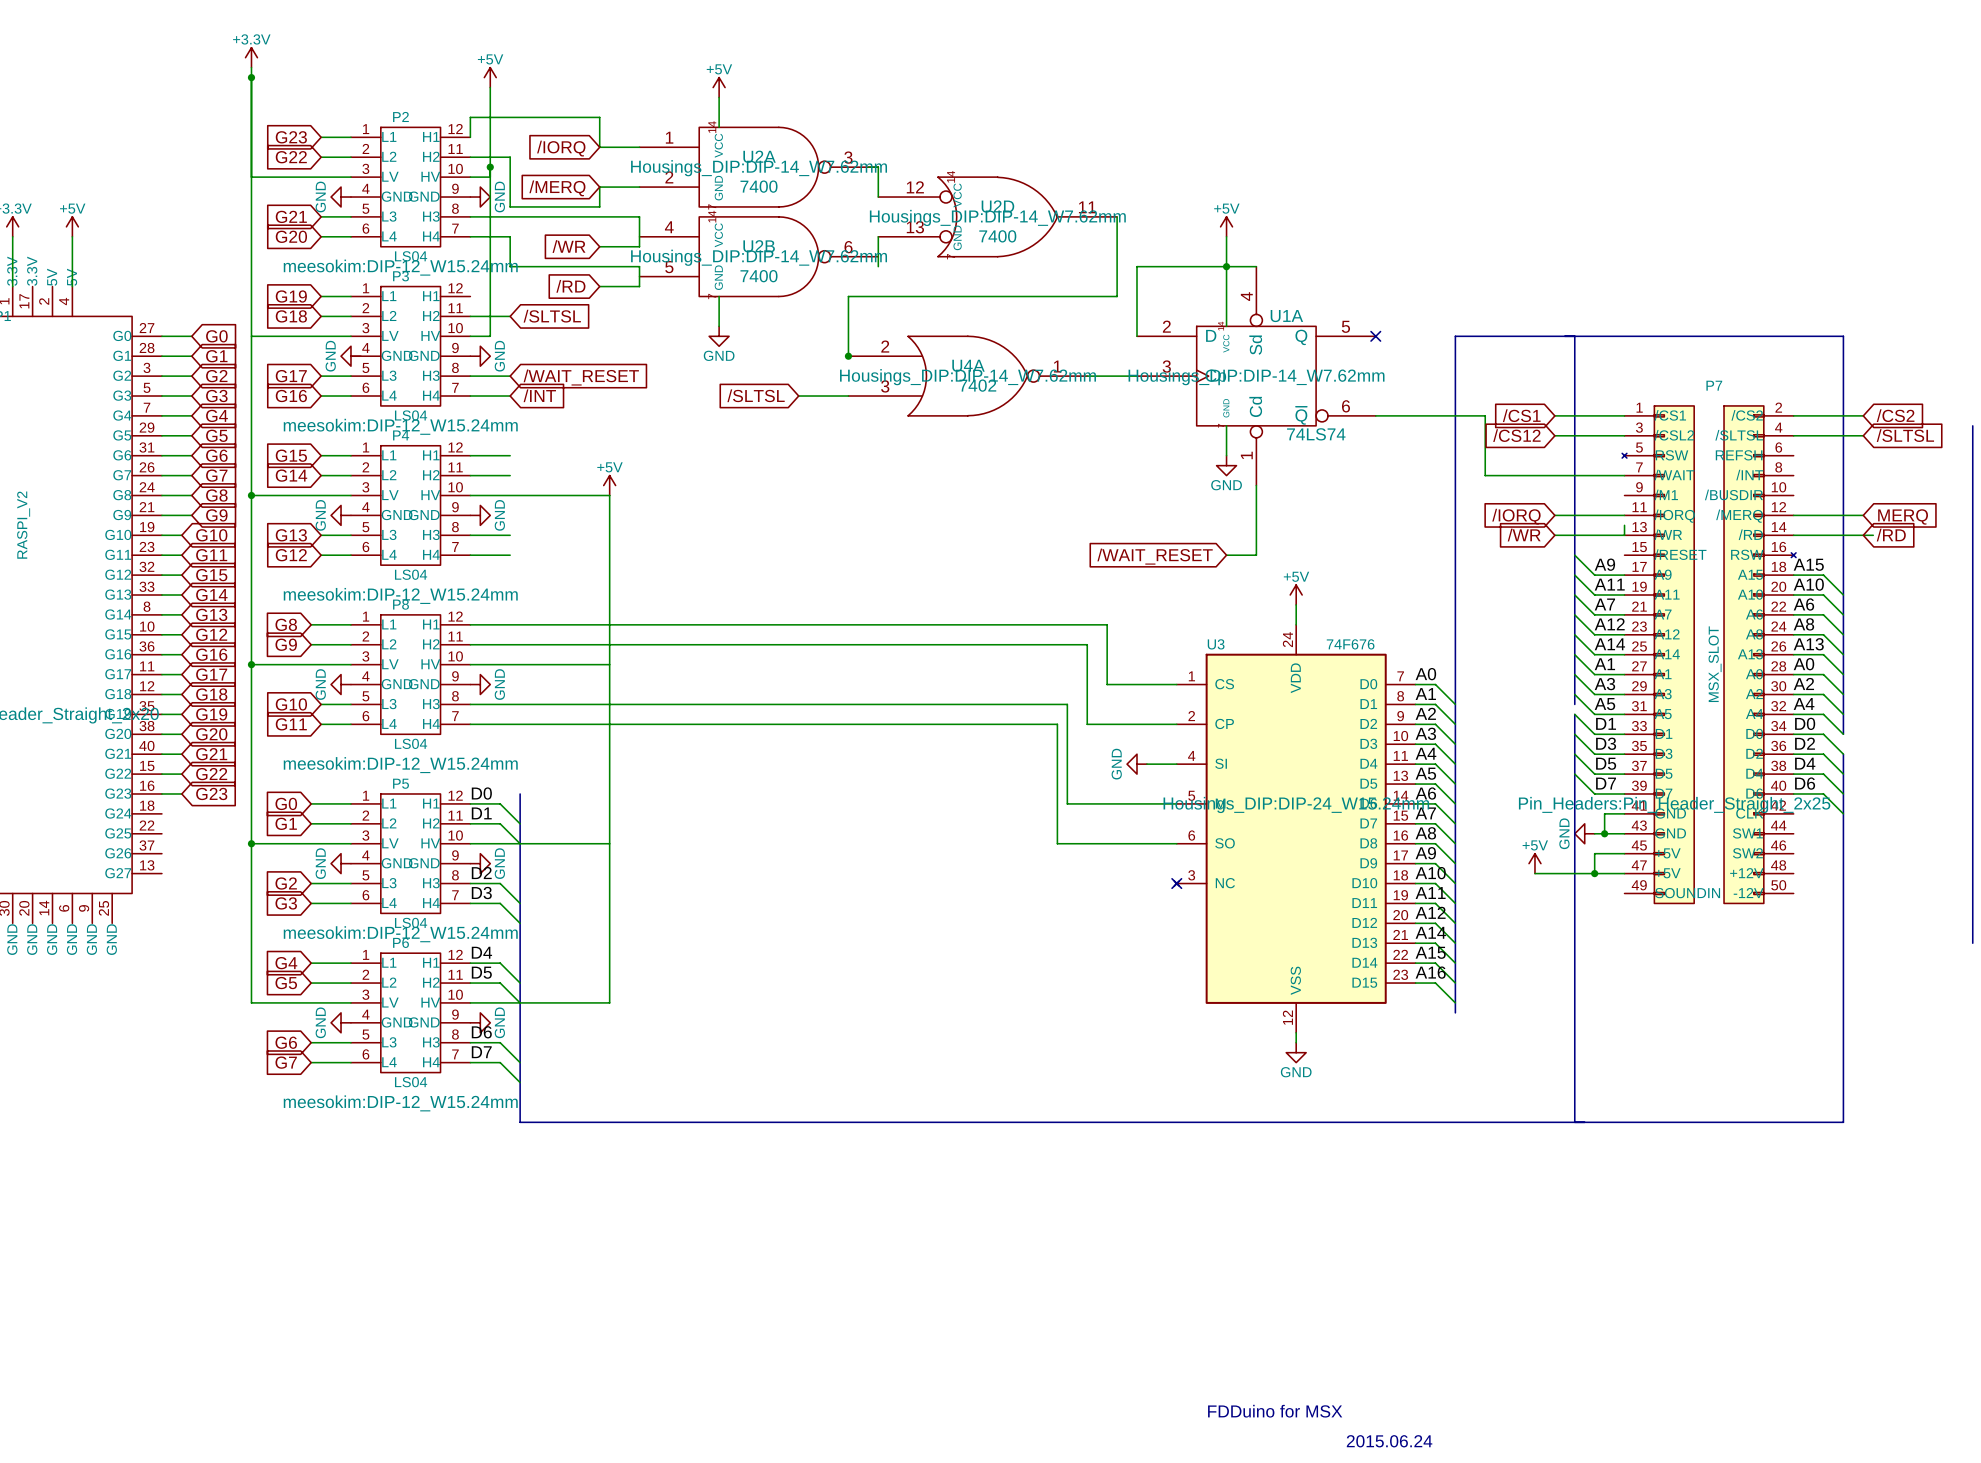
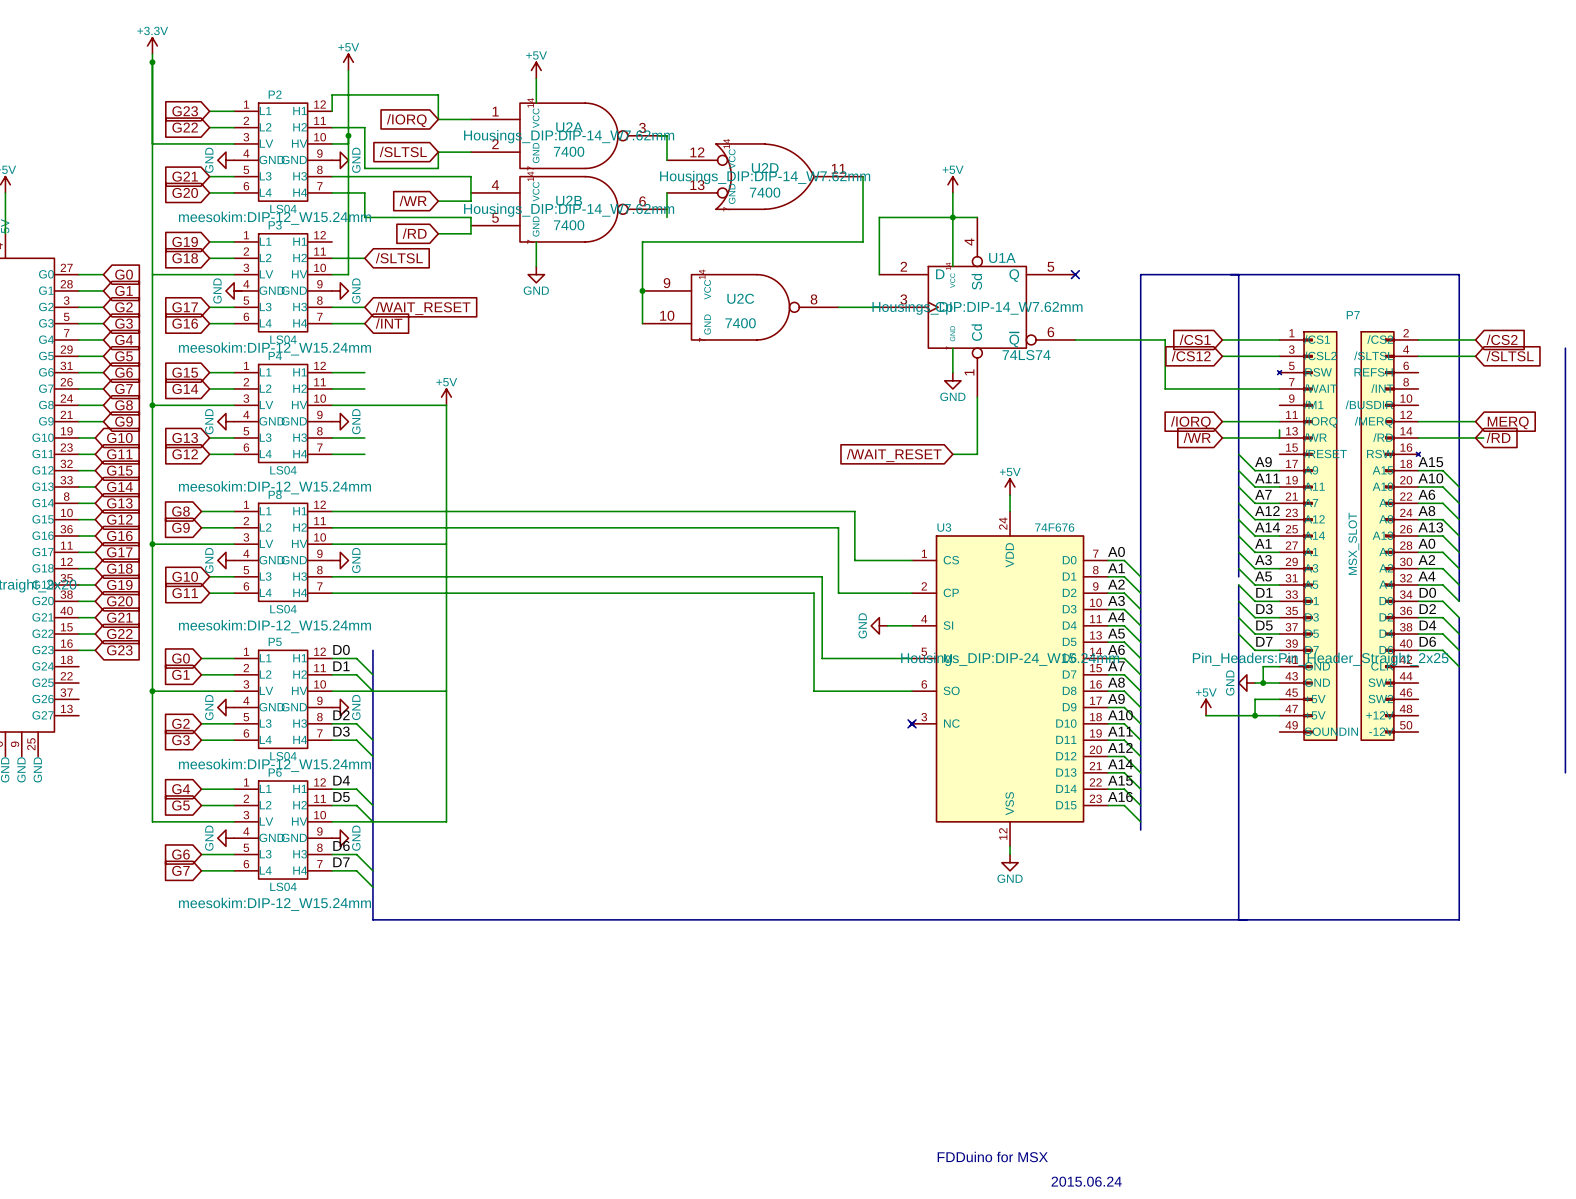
global label: /MERQ (557, 188) -> /SLTSL (403, 151)
U4A: 7402 (967, 376) -> none
U2C: none -> 7400 (740, 307)
global label: /SLTSL (756, 395) -> none
wire: (798, 396) (848, 396) -> (642, 290) (642, 323)

